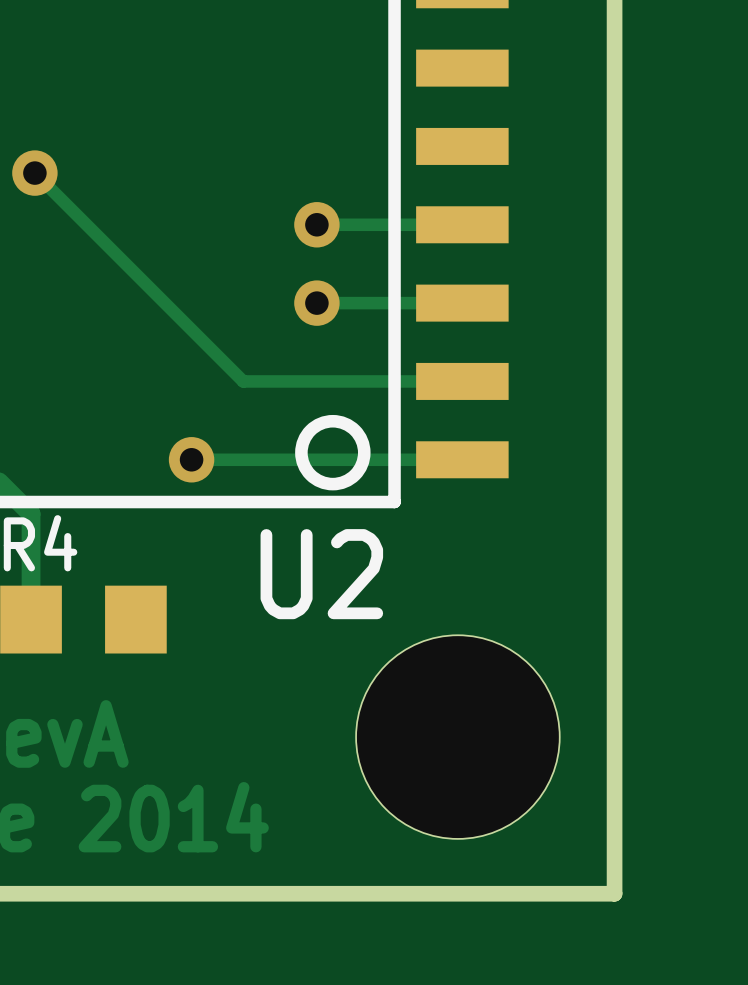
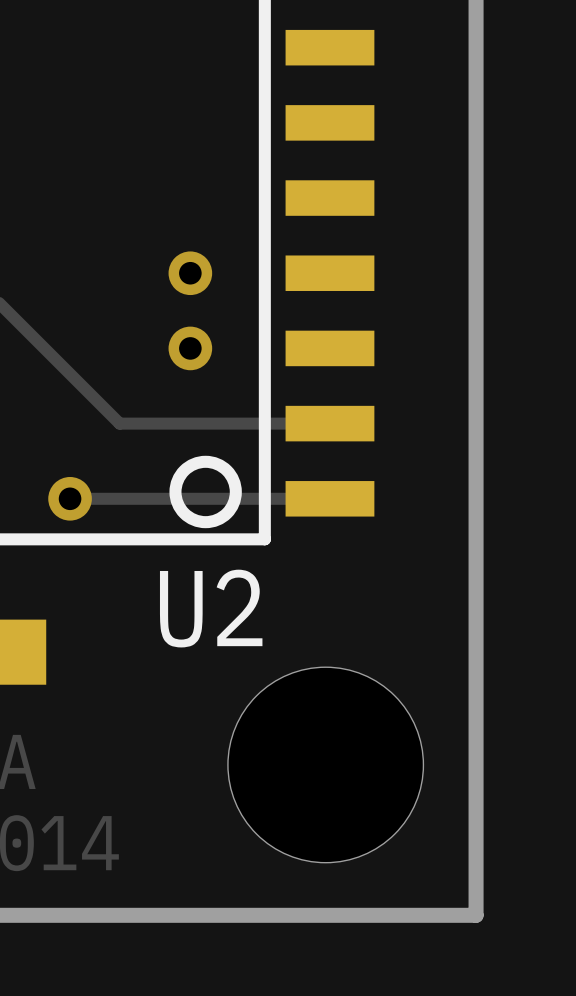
track: (316, 224) (462, 224) -> none
track: (316, 303) (462, 303) -> none

